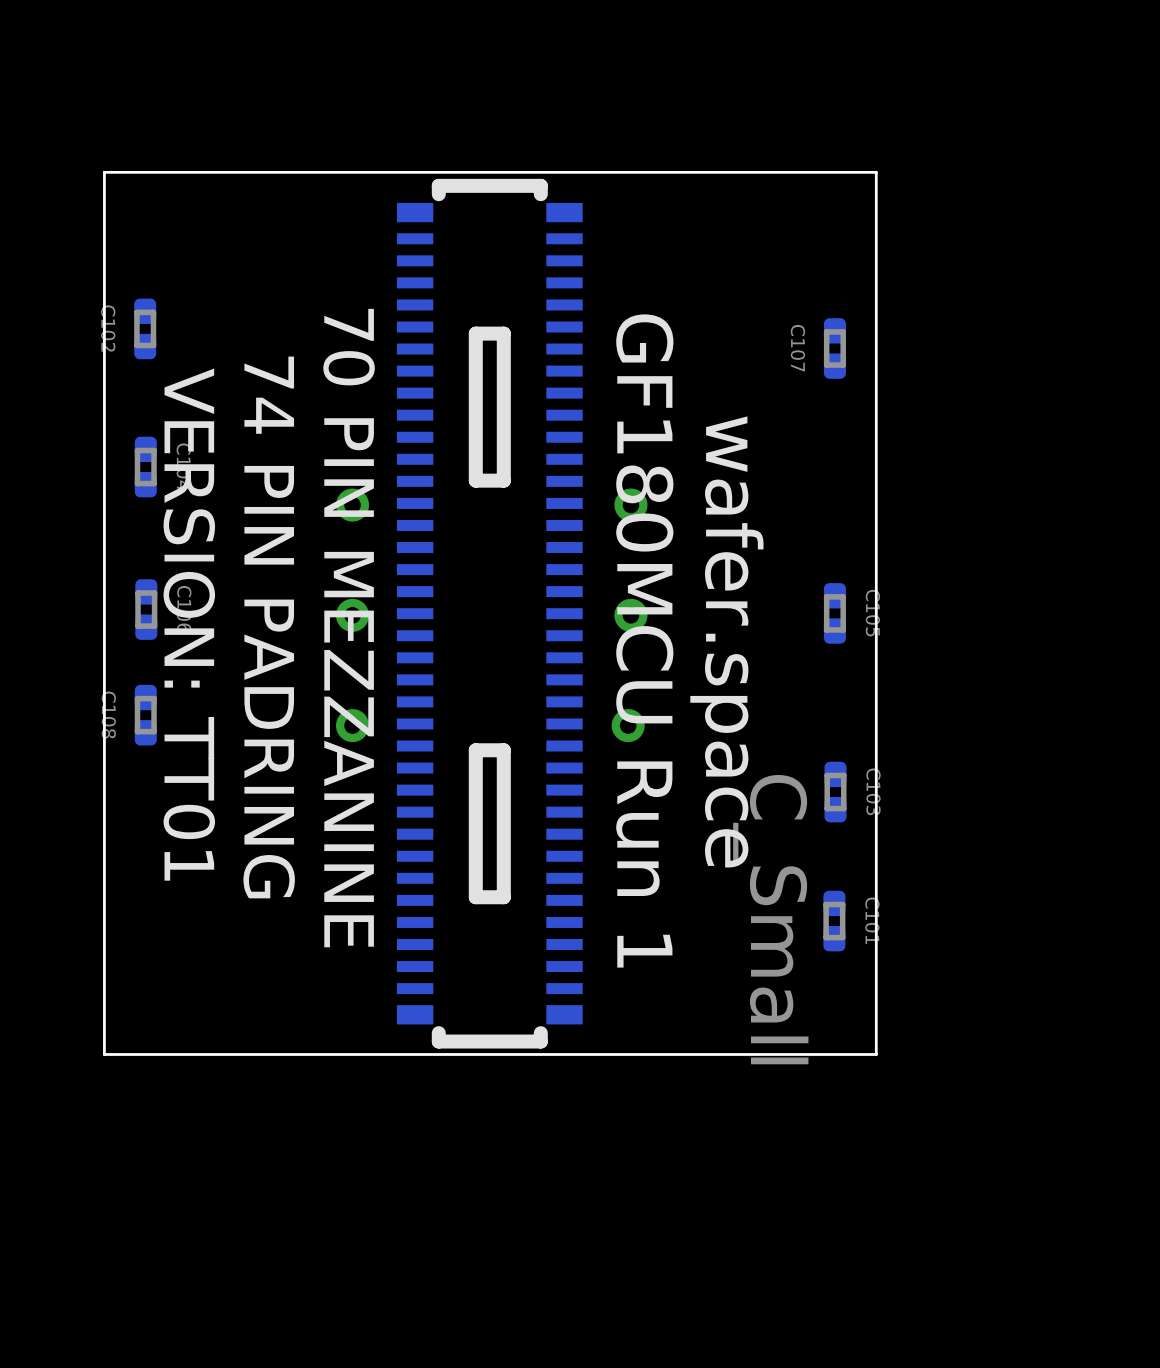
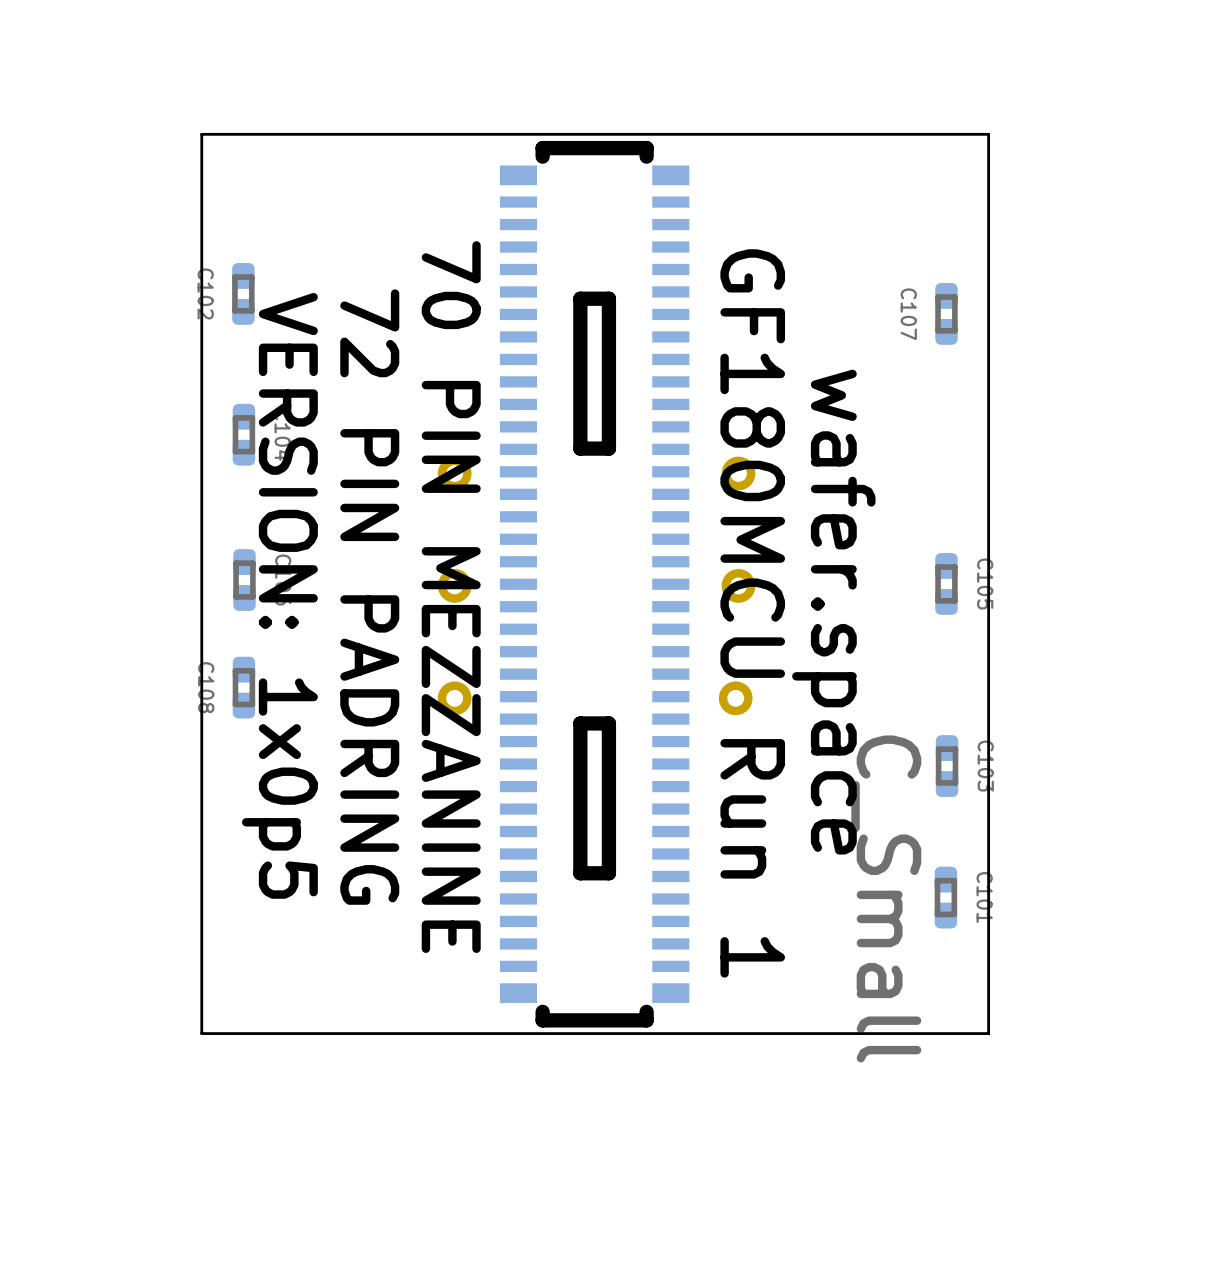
text: VERSION: TT01 (189, 624) -> VERSION: 1x0p5 (279, 595)
text: 74 PIN PADRING (269, 627) -> 72 PIN PADRING (369, 597)

